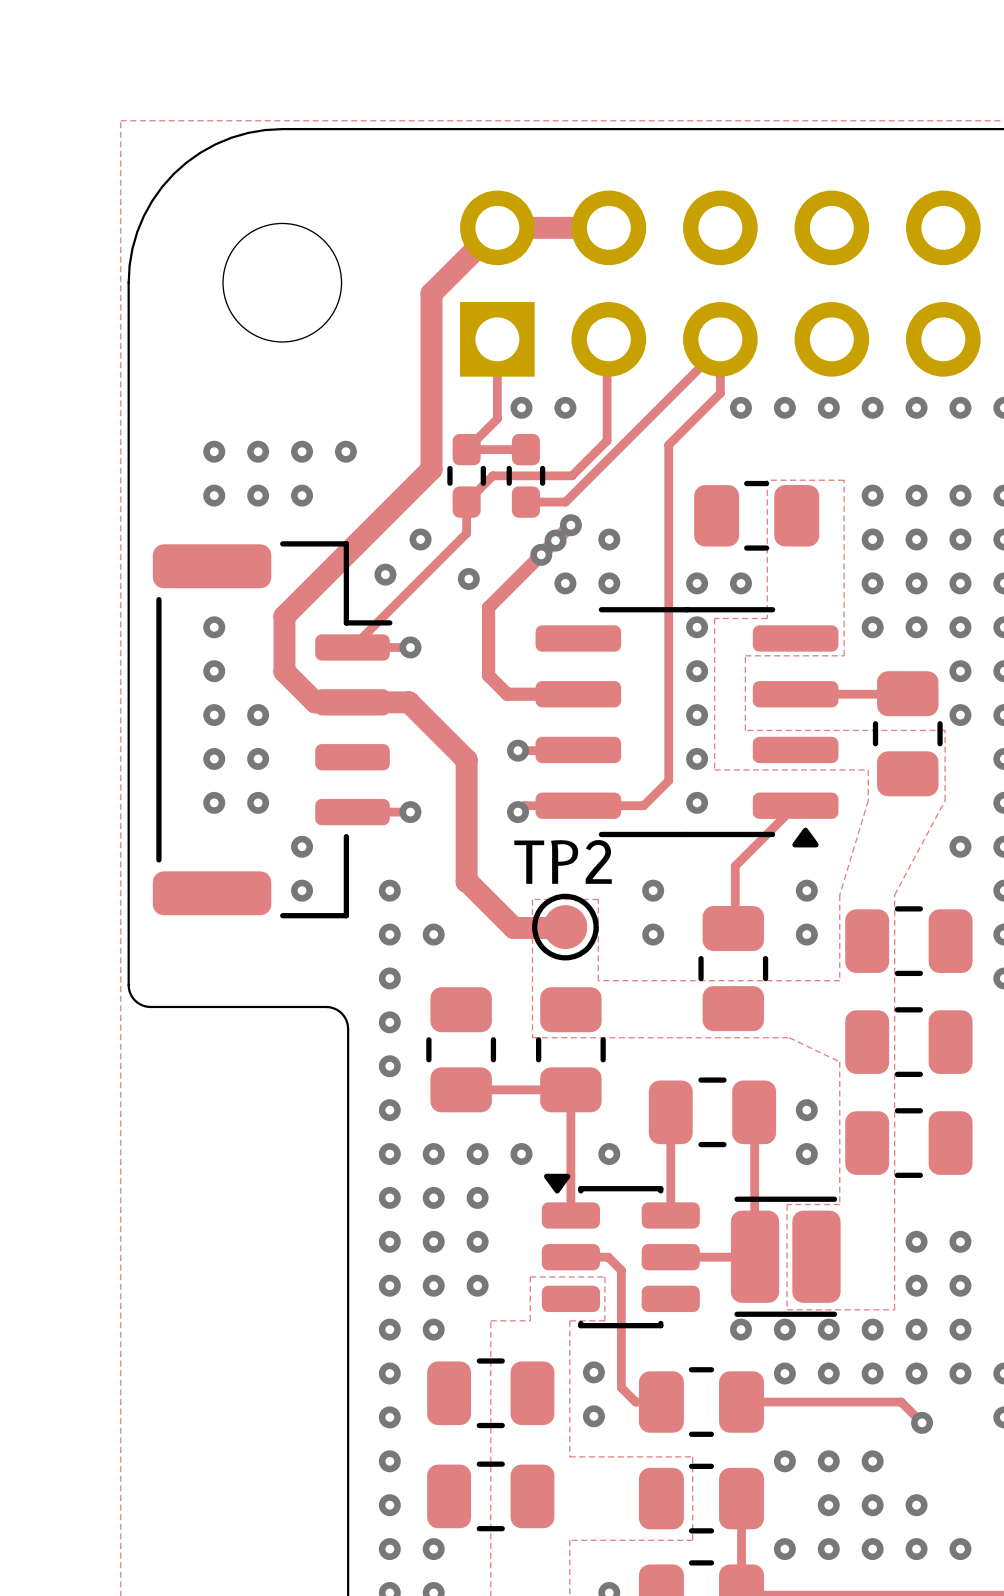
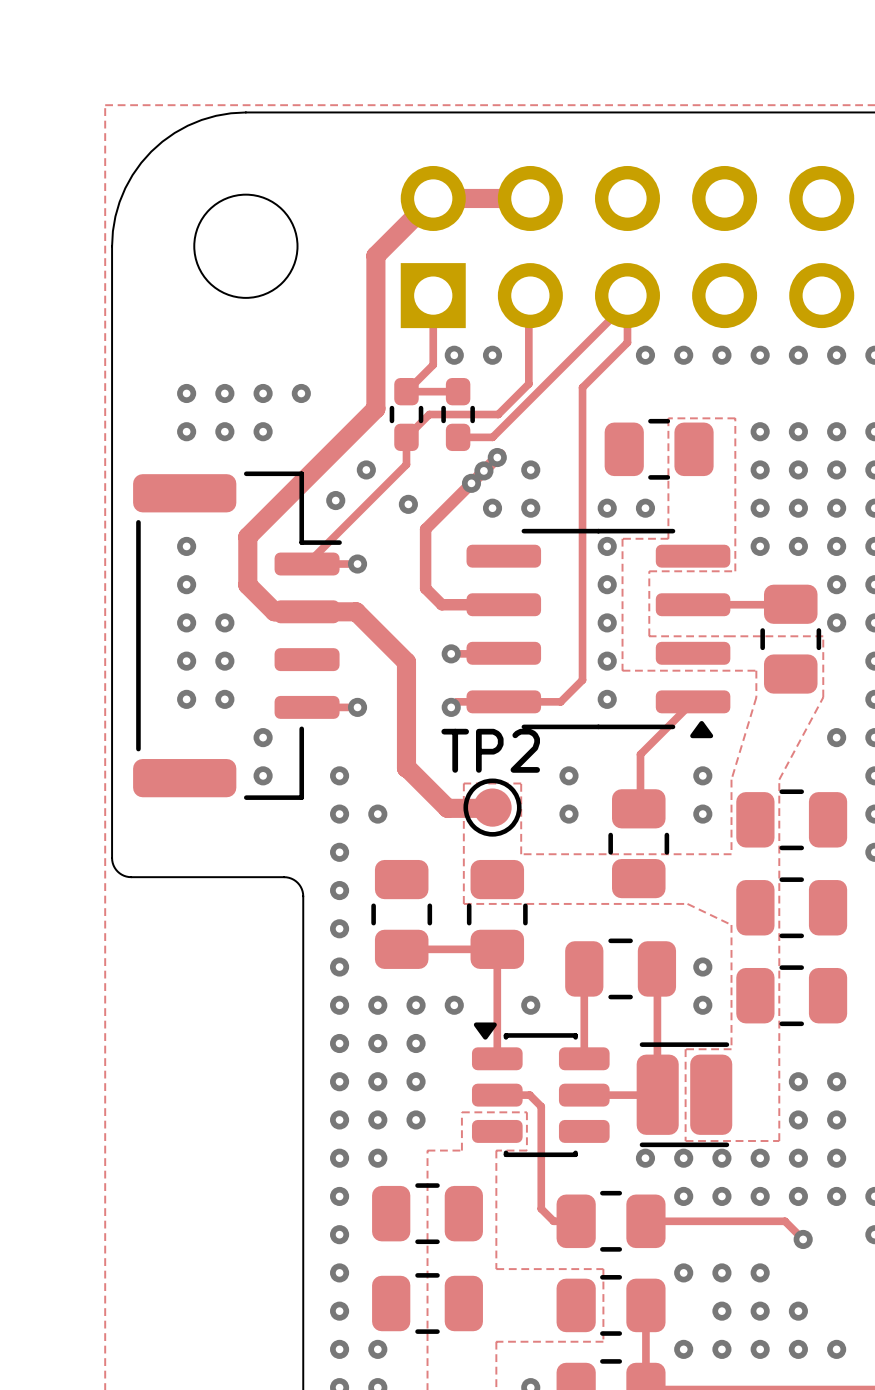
via: (593, 1372) -> none
via: (593, 1416) -> none

